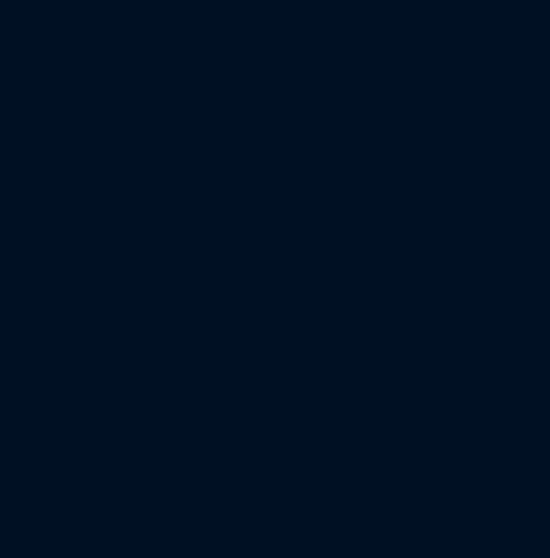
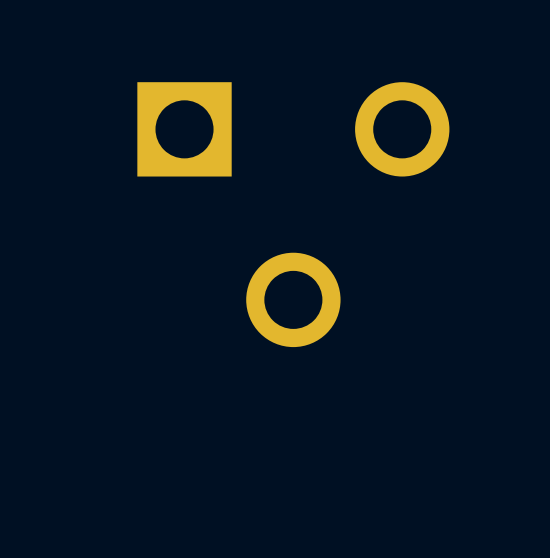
part: none -> (293, 214)

